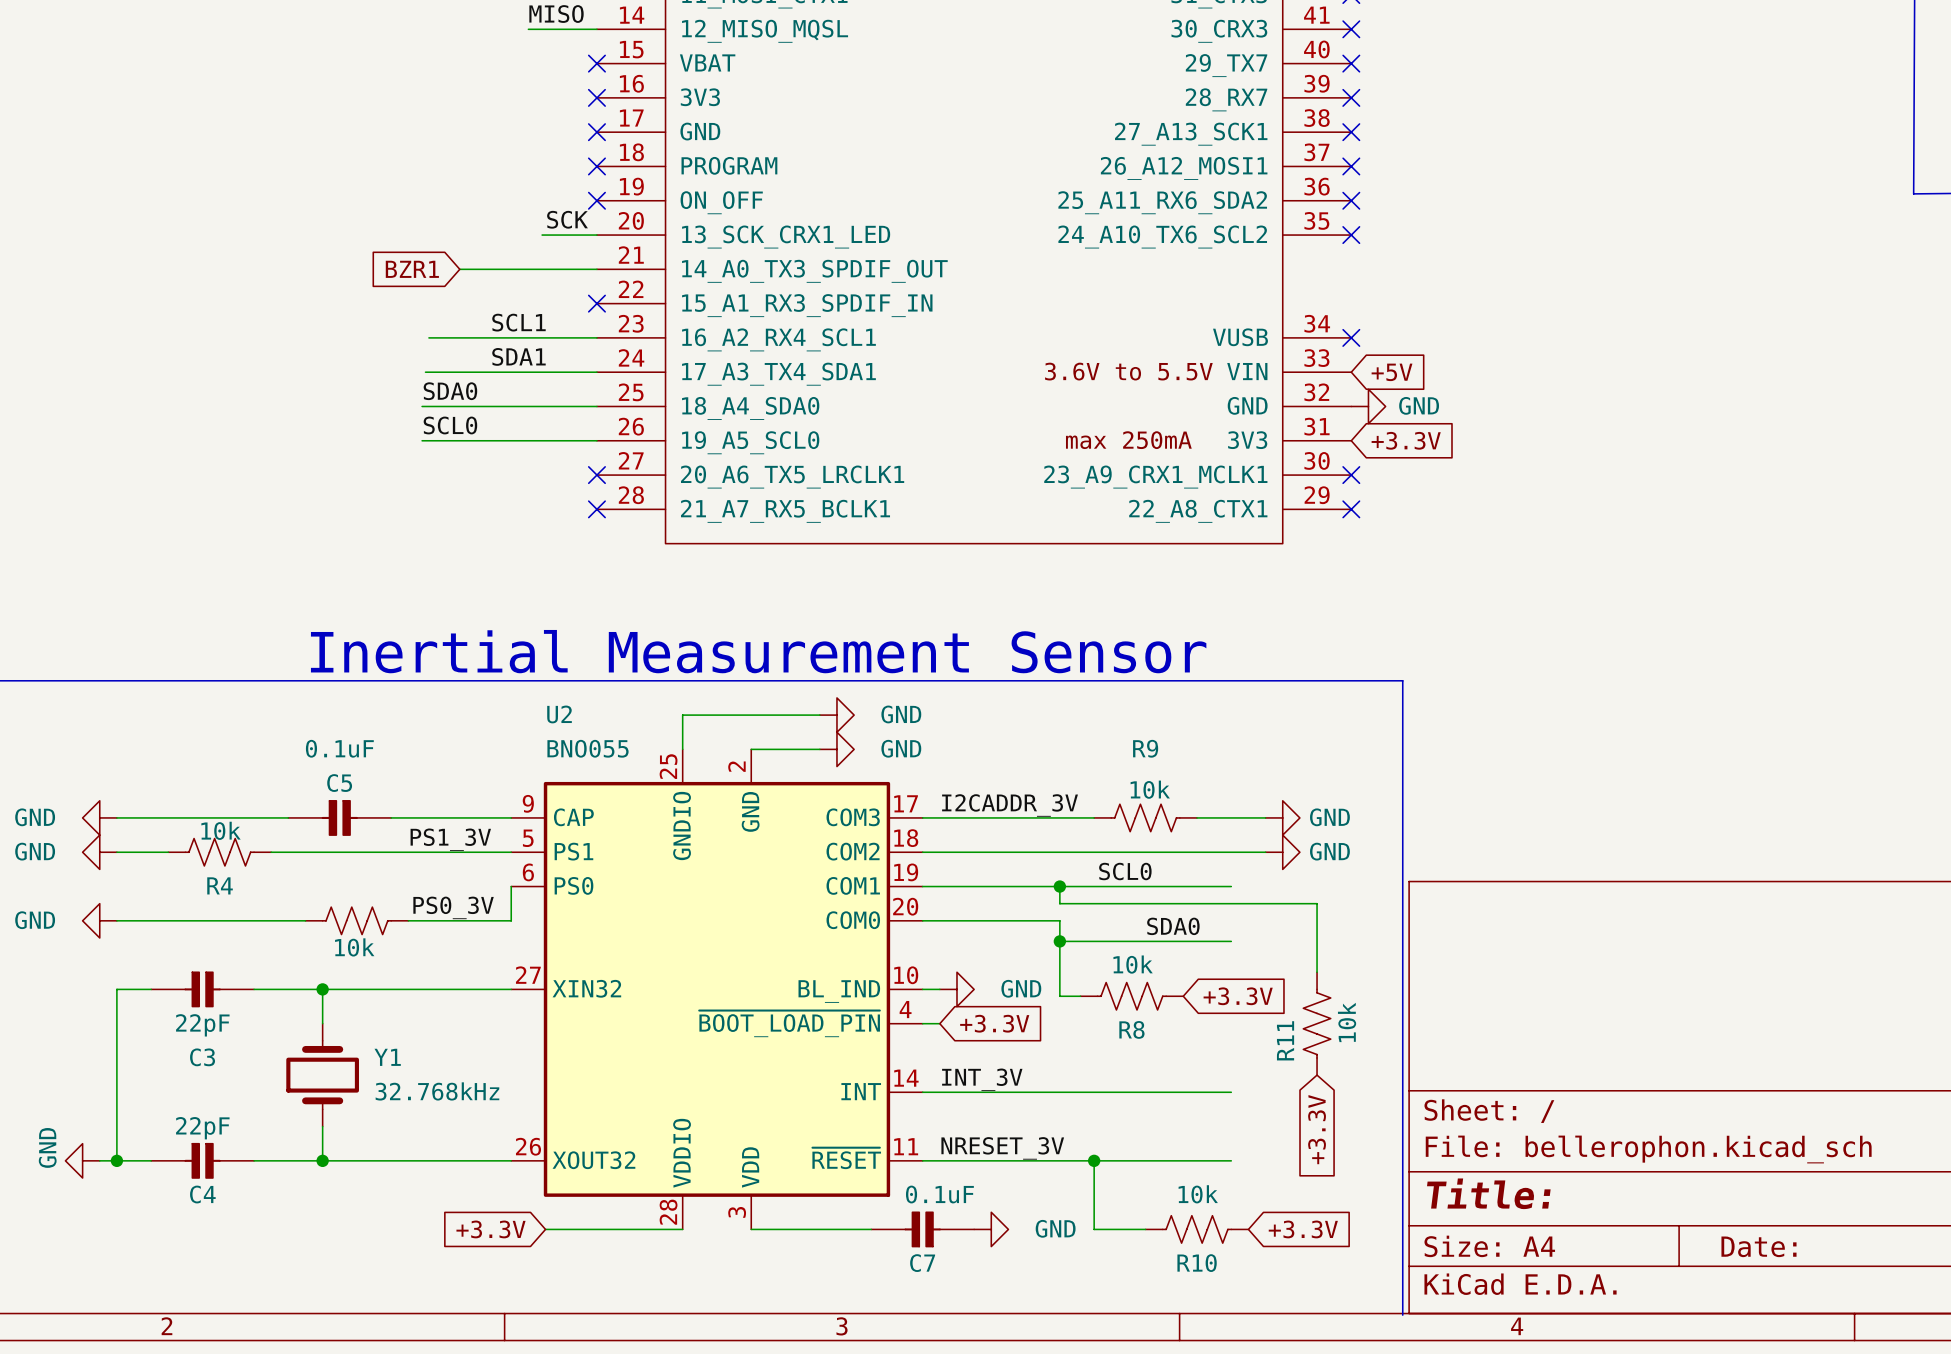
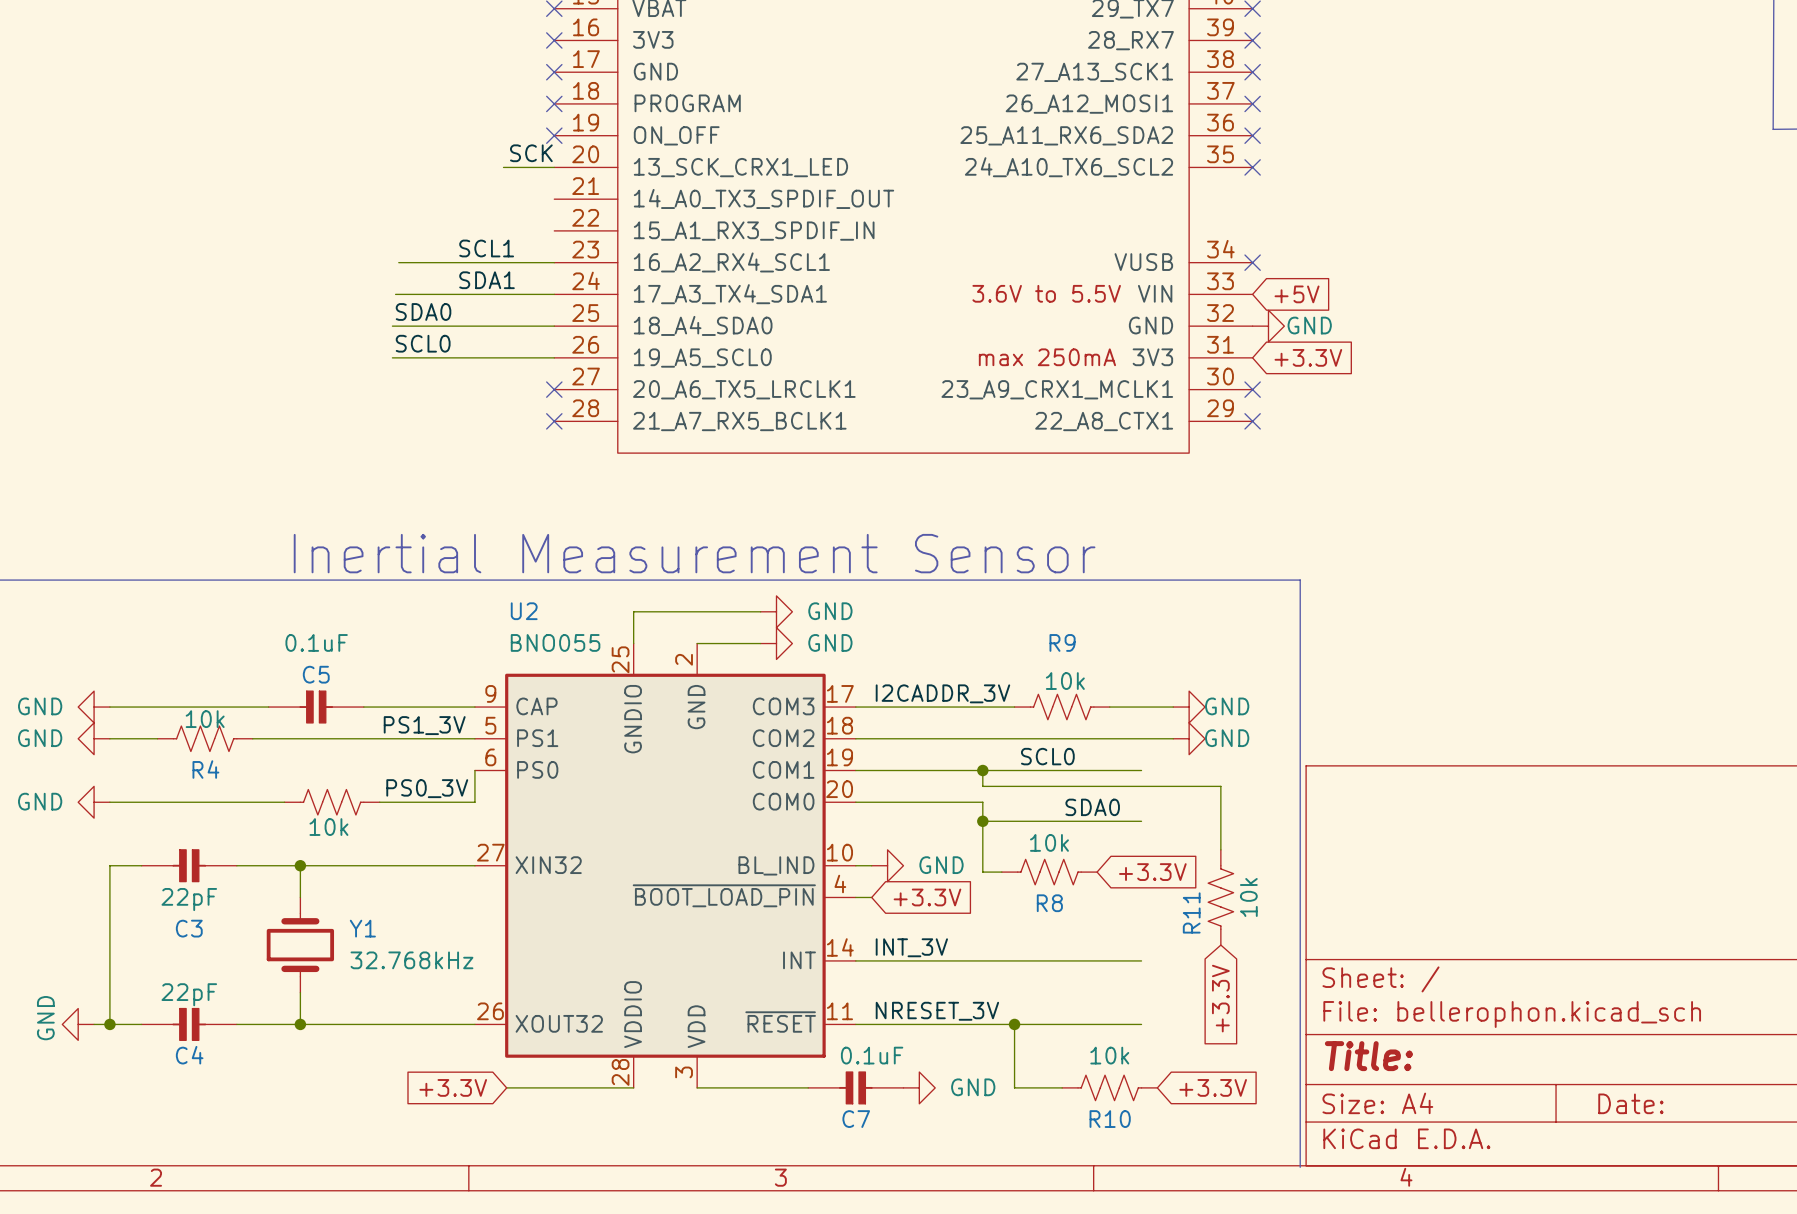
global label: BZR1 (412, 269) -> none
wire: (459, 269) (596, 269) -> none
no-connect mark: (596, 303) -> none

